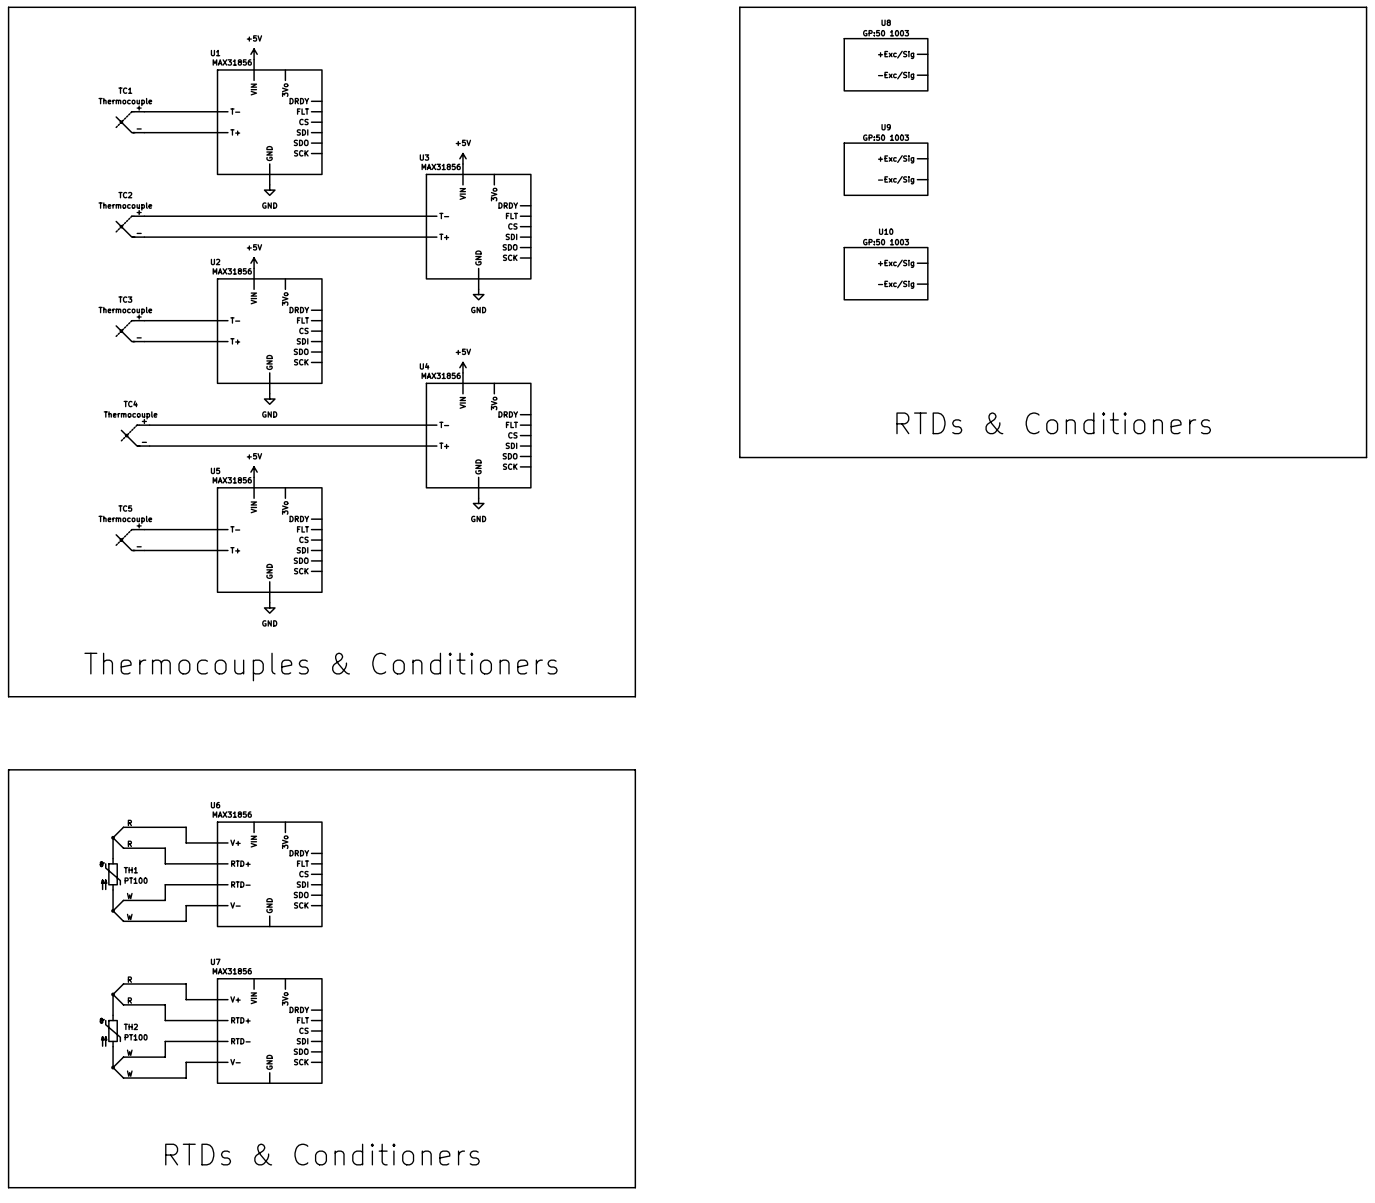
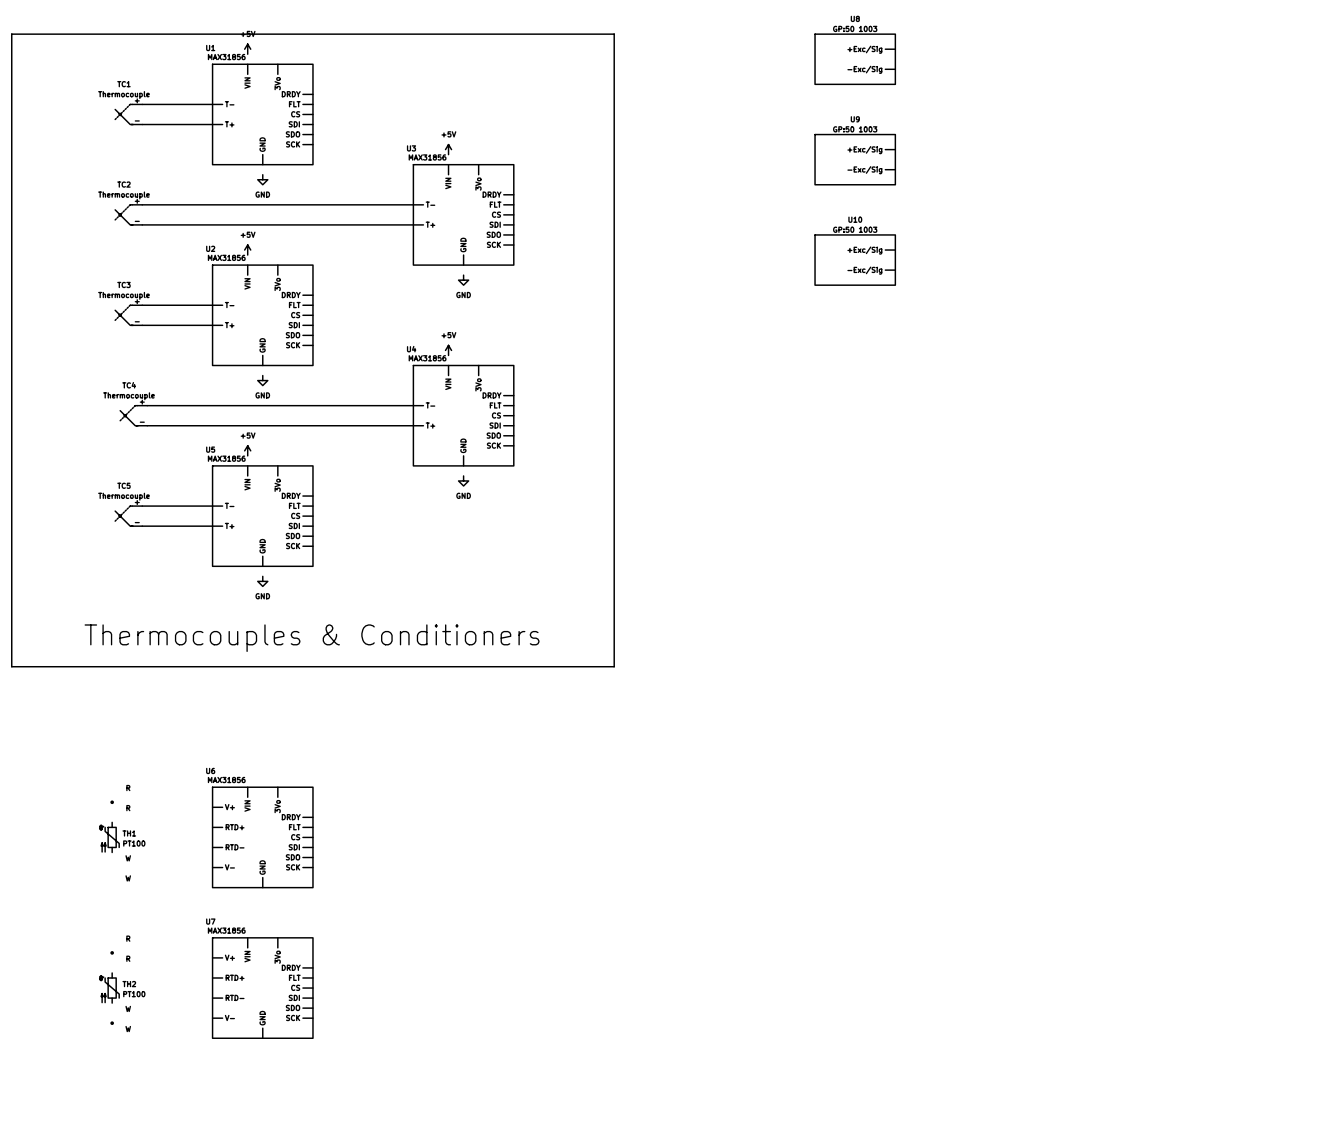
line: (739, 7) (1366, 7) (1366, 457) (739, 457) (739, 7) -> none
line: (8, 38) (8, 7) (635, 7) (635, 38) -> (11, 34) (614, 34)
wire: (254, 59) (254, 69) -> none
wire: (462, 163) (462, 174) -> none
wire: (269, 174) (269, 184) -> none
wire: (254, 268) (254, 278) -> none
wire: (478, 278) (478, 289) -> none
wire: (462, 372) (462, 383) -> none
wire: (269, 383) (269, 393) -> none
text: RTDs & Conditioners (1053, 423) -> none
wire: (254, 477) (254, 487) -> none
wire: (478, 487) (478, 498) -> none
wire: (269, 592) (269, 602) -> none
line: (8, 769) (8, 1187) (635, 1187) (635, 769) (8, 769) -> none
wire: (113, 837) (123, 827) (186, 827) (186, 842) (217, 842) -> none
wire: (113, 837) (113, 858) -> none
wire: (113, 837) (123, 848) (165, 848) (165, 863) (217, 863) -> none
wire: (217, 884) (165, 884) (165, 900) (123, 900) (113, 910) -> none
wire: (113, 889) (113, 910) -> none
wire: (217, 905) (186, 905) (186, 921) (123, 921) (113, 910) -> none
junction: (113, 910) -> none
wire: (113, 994) (123, 1004) (165, 1004) (165, 1020) (217, 1020) -> none
wire: (113, 994) (123, 983) (186, 983) (186, 999) (217, 999) -> none
wire: (113, 994) (113, 1015) -> none
wire: (217, 1041) (165, 1041) (165, 1057) (123, 1057) (113, 1067) -> none
wire: (113, 1046) (113, 1067) -> none
wire: (217, 1062) (186, 1062) (186, 1078) (123, 1078) (113, 1067) -> none
text: RTDs & Conditioners (322, 1154) -> none

